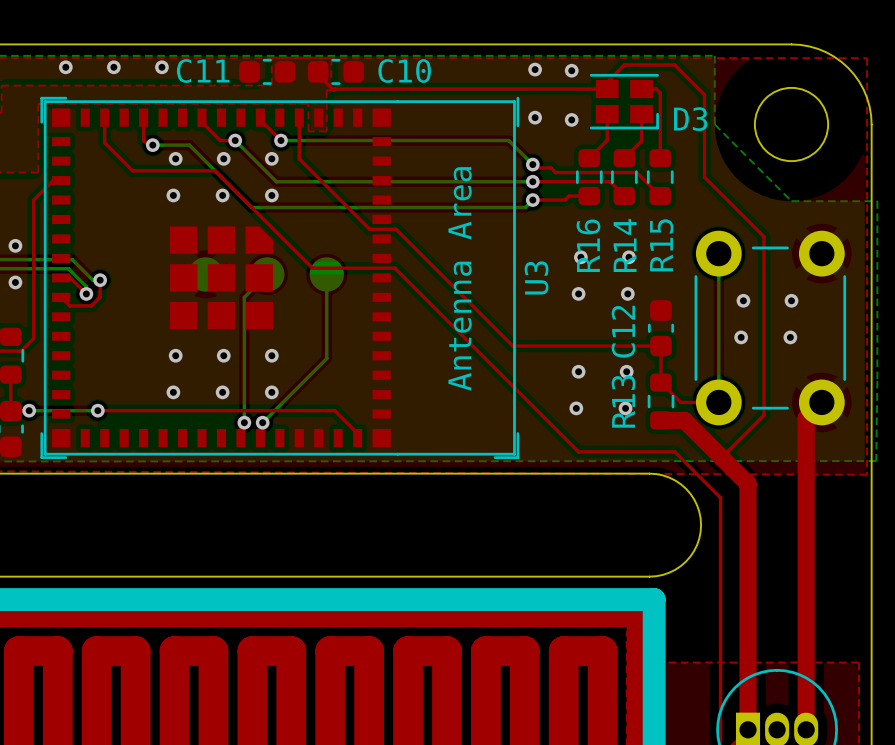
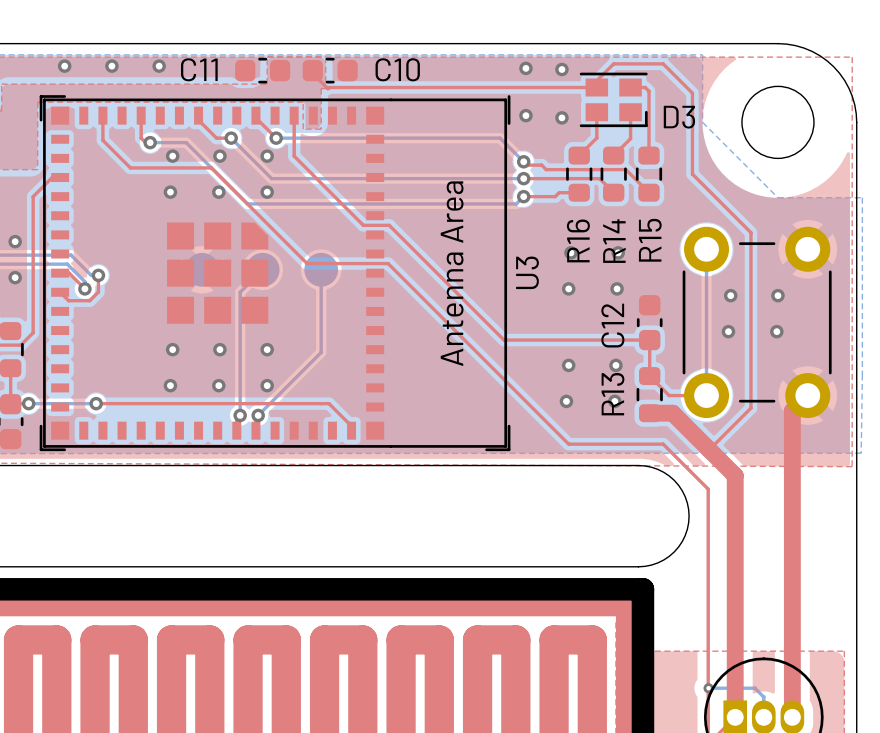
bottom track: none -> (708, 688) (754, 688) (763, 697) (763, 717)
via: none -> (708, 688)

